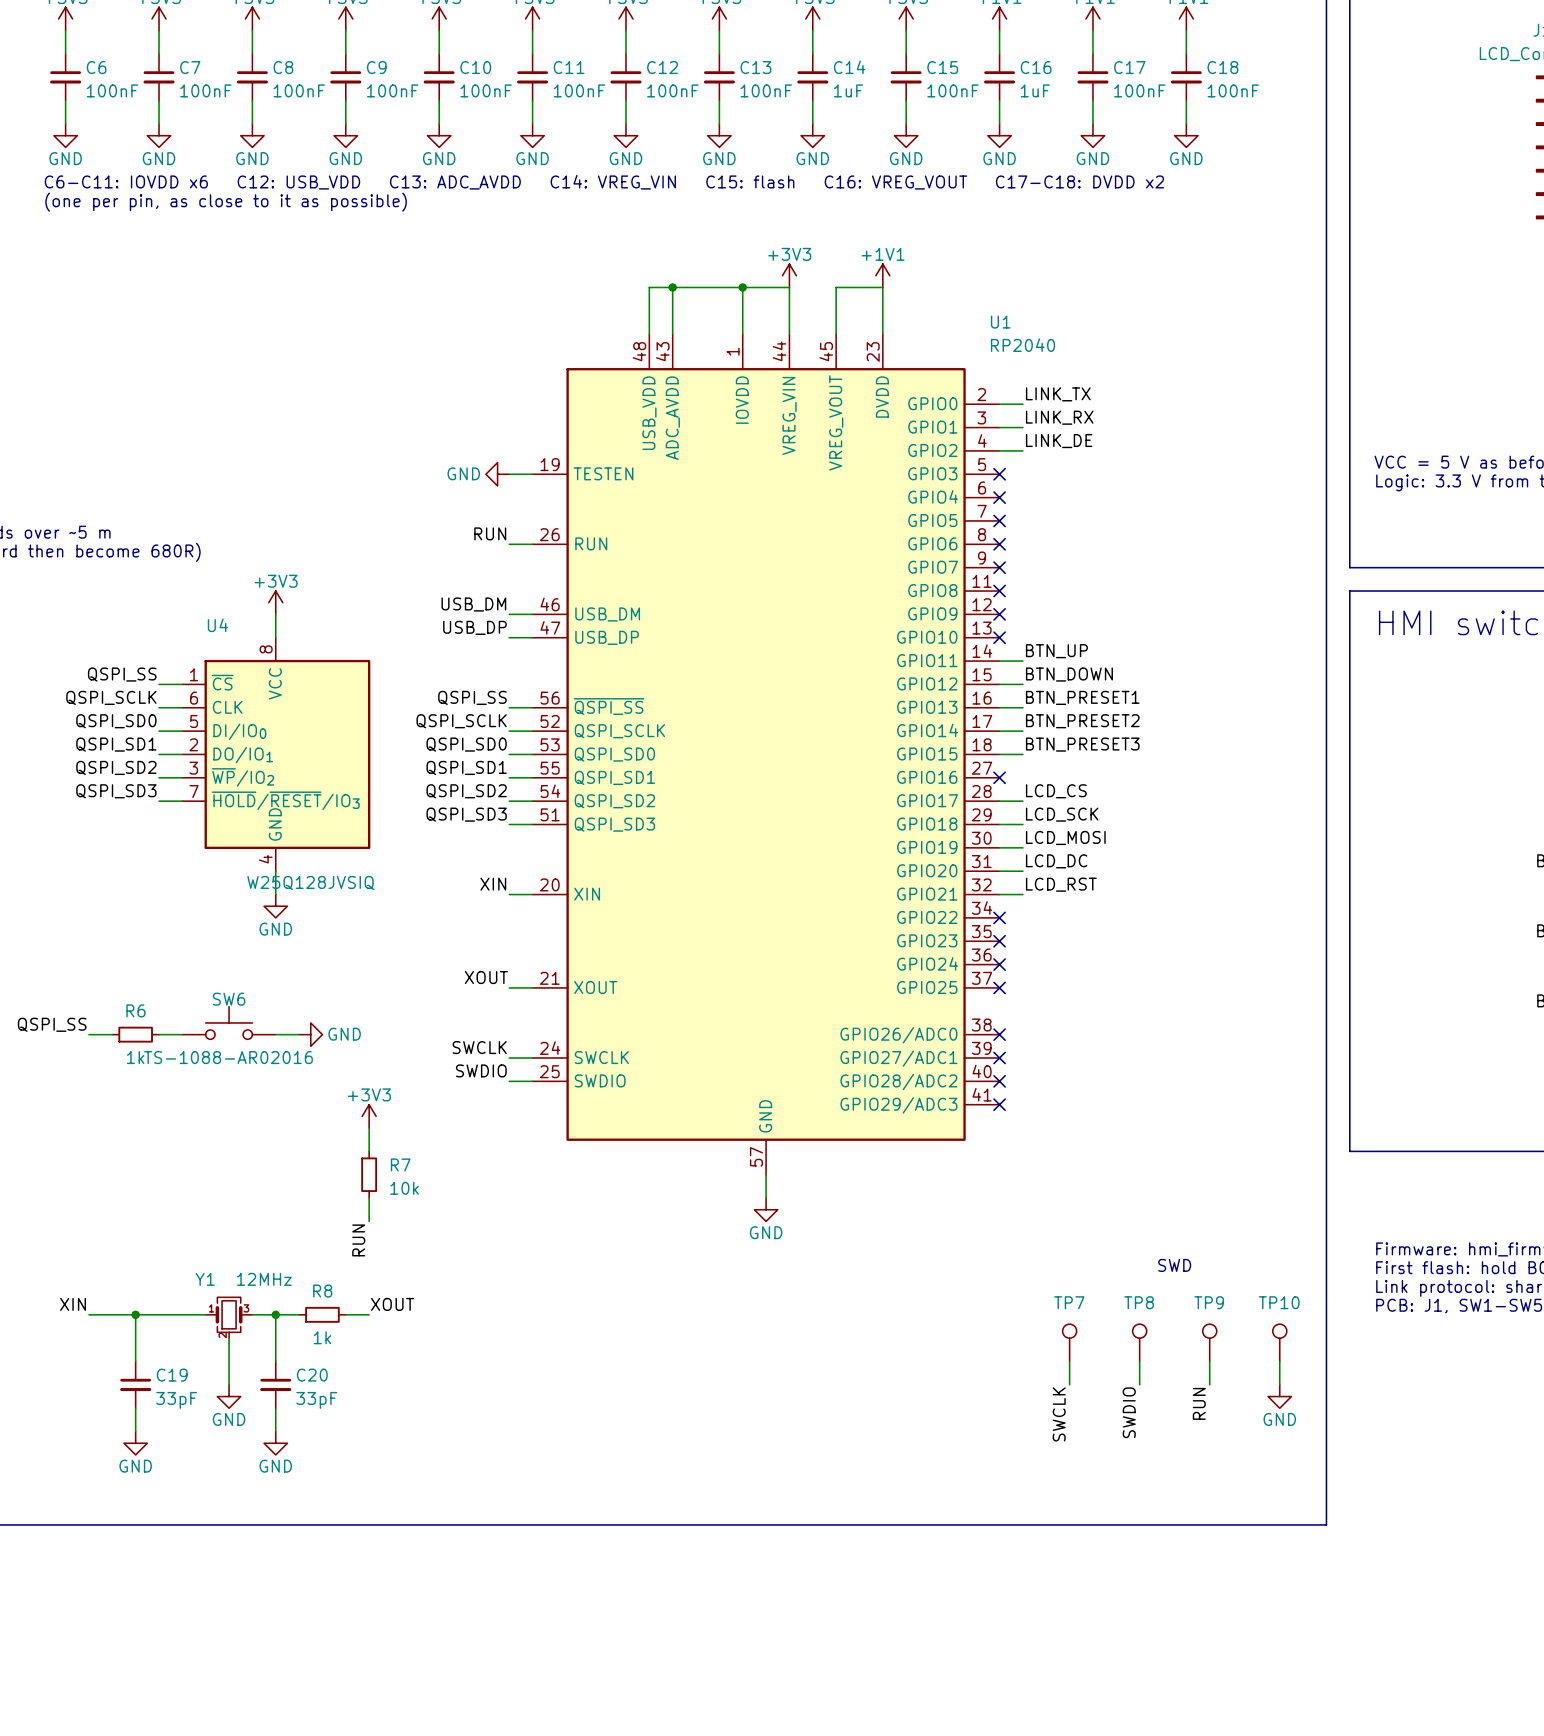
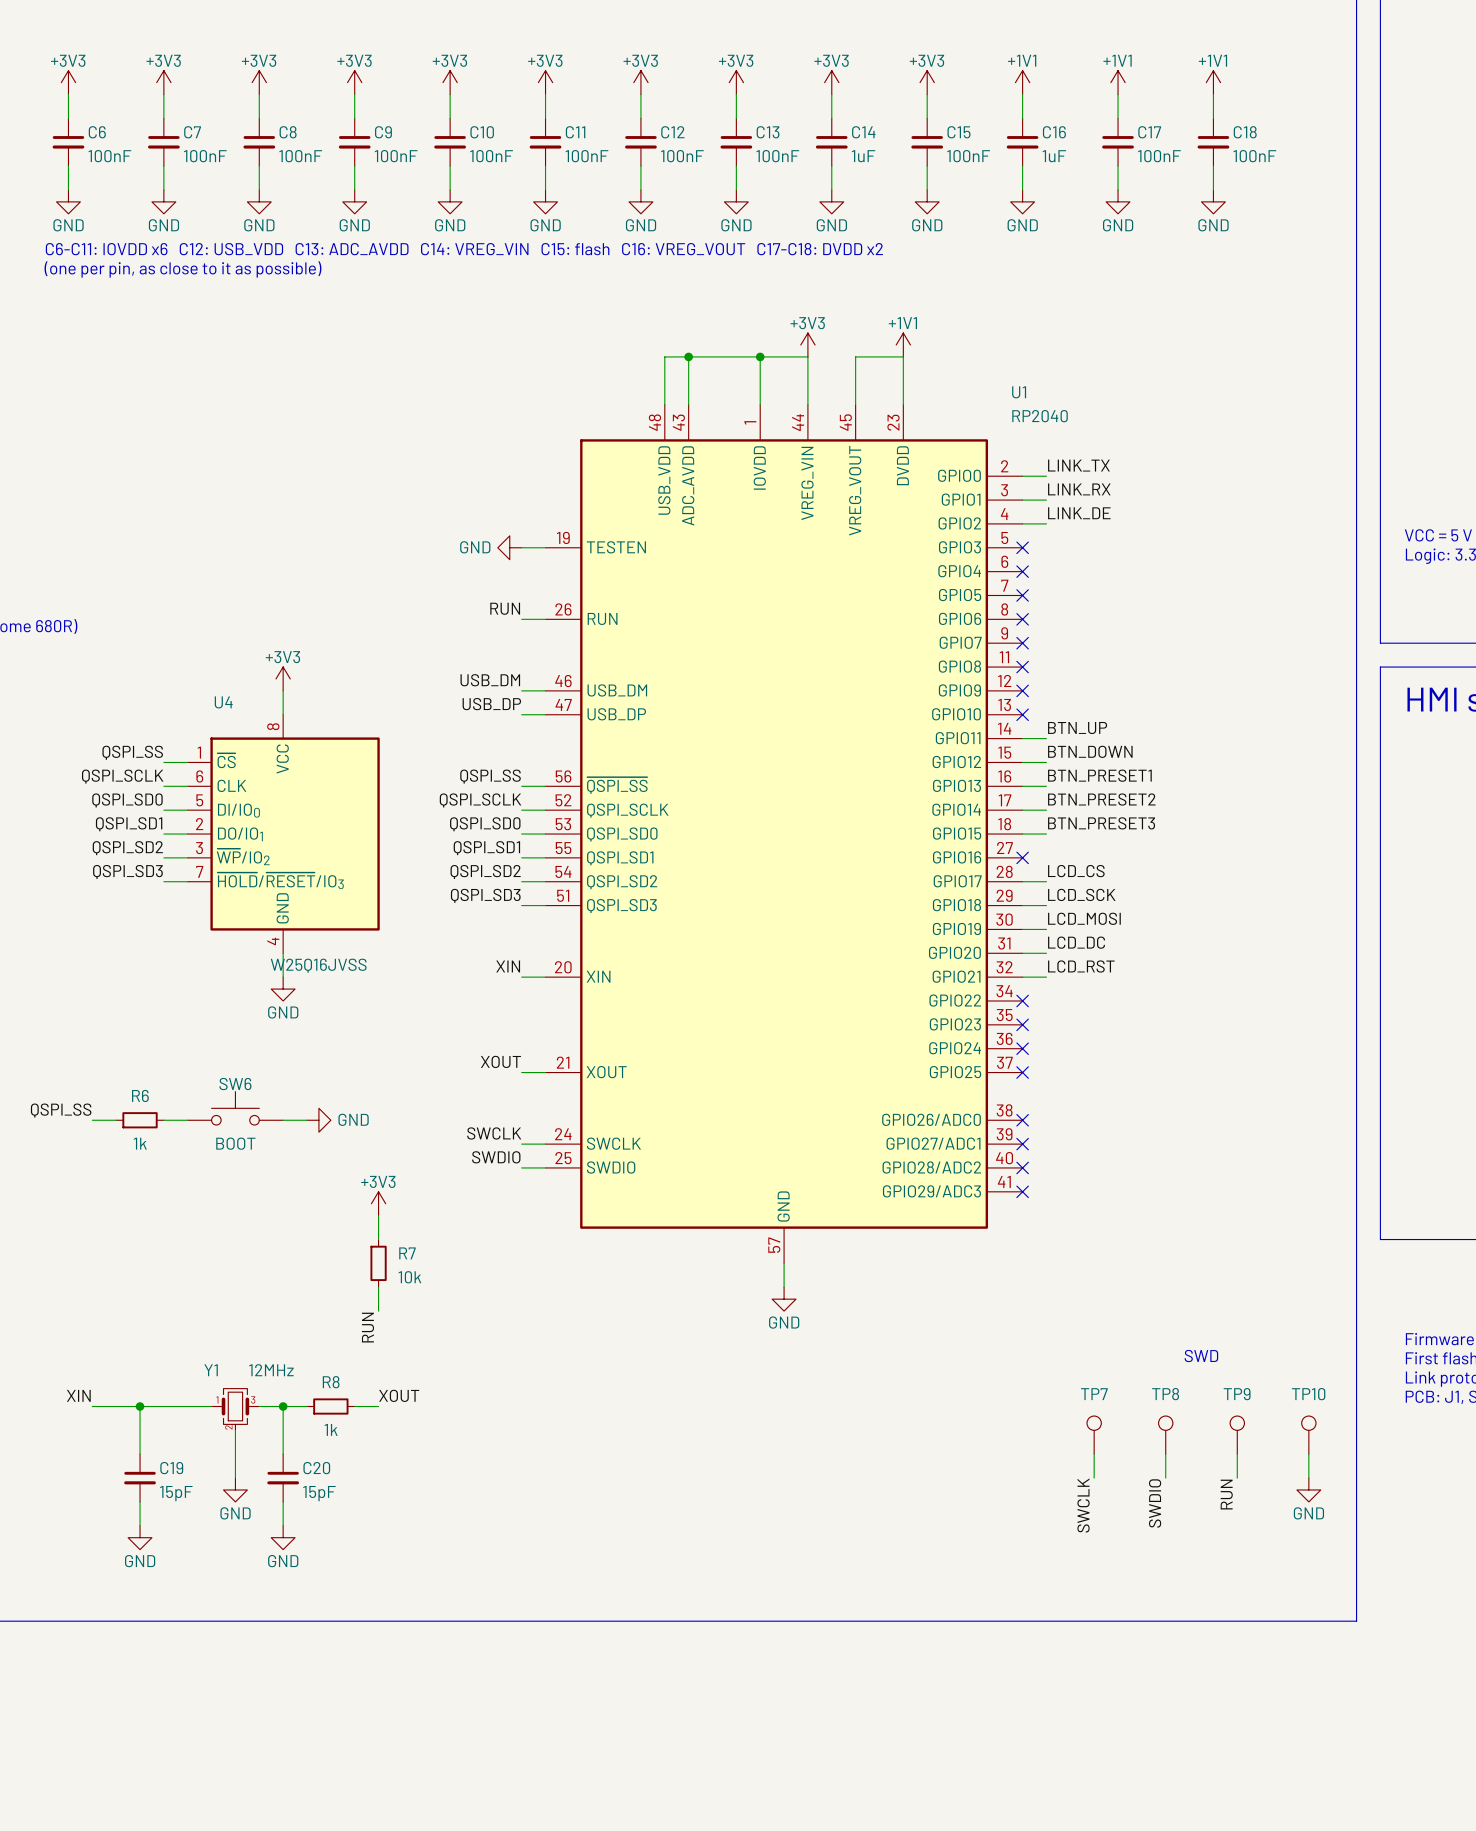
U4 value: W25Q128JVSIQ (310, 883) -> W25Q16JVSS (318, 965)
SW6 value: TS-1088-AR02016 (228, 1057) -> BOOT (235, 1143)
C19 value: 33pF (176, 1400) -> 15pF (176, 1493)
C20 value: 33pF (316, 1400) -> 15pF (319, 1493)

